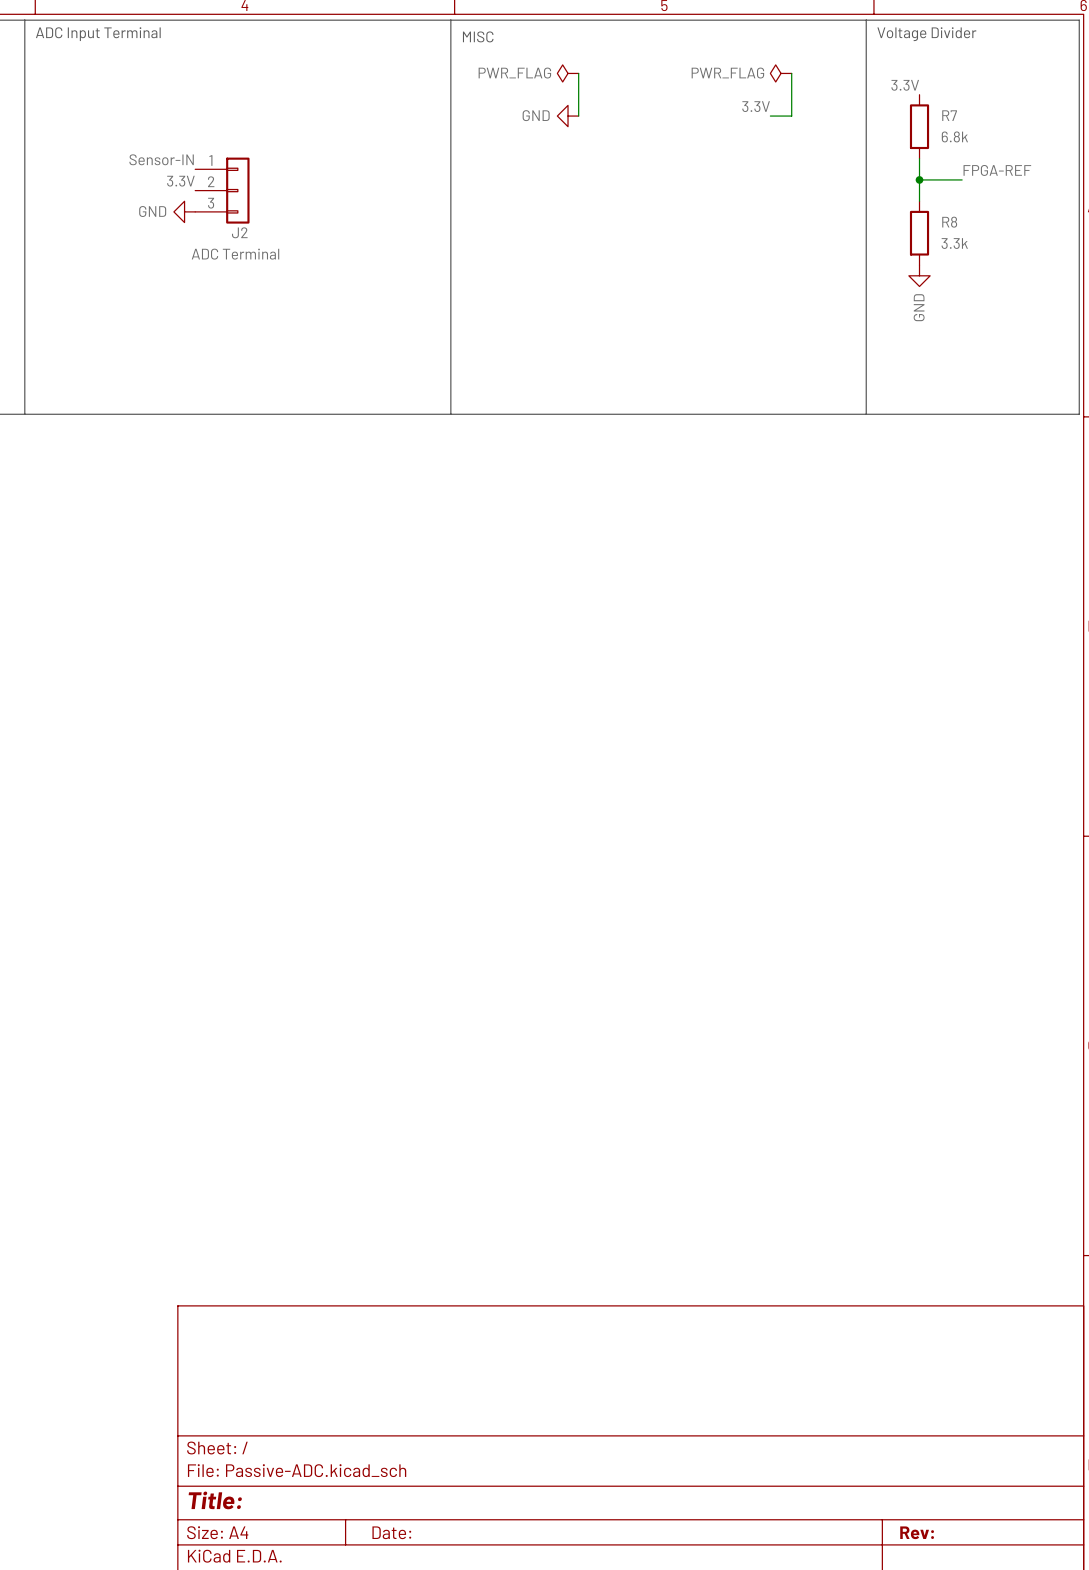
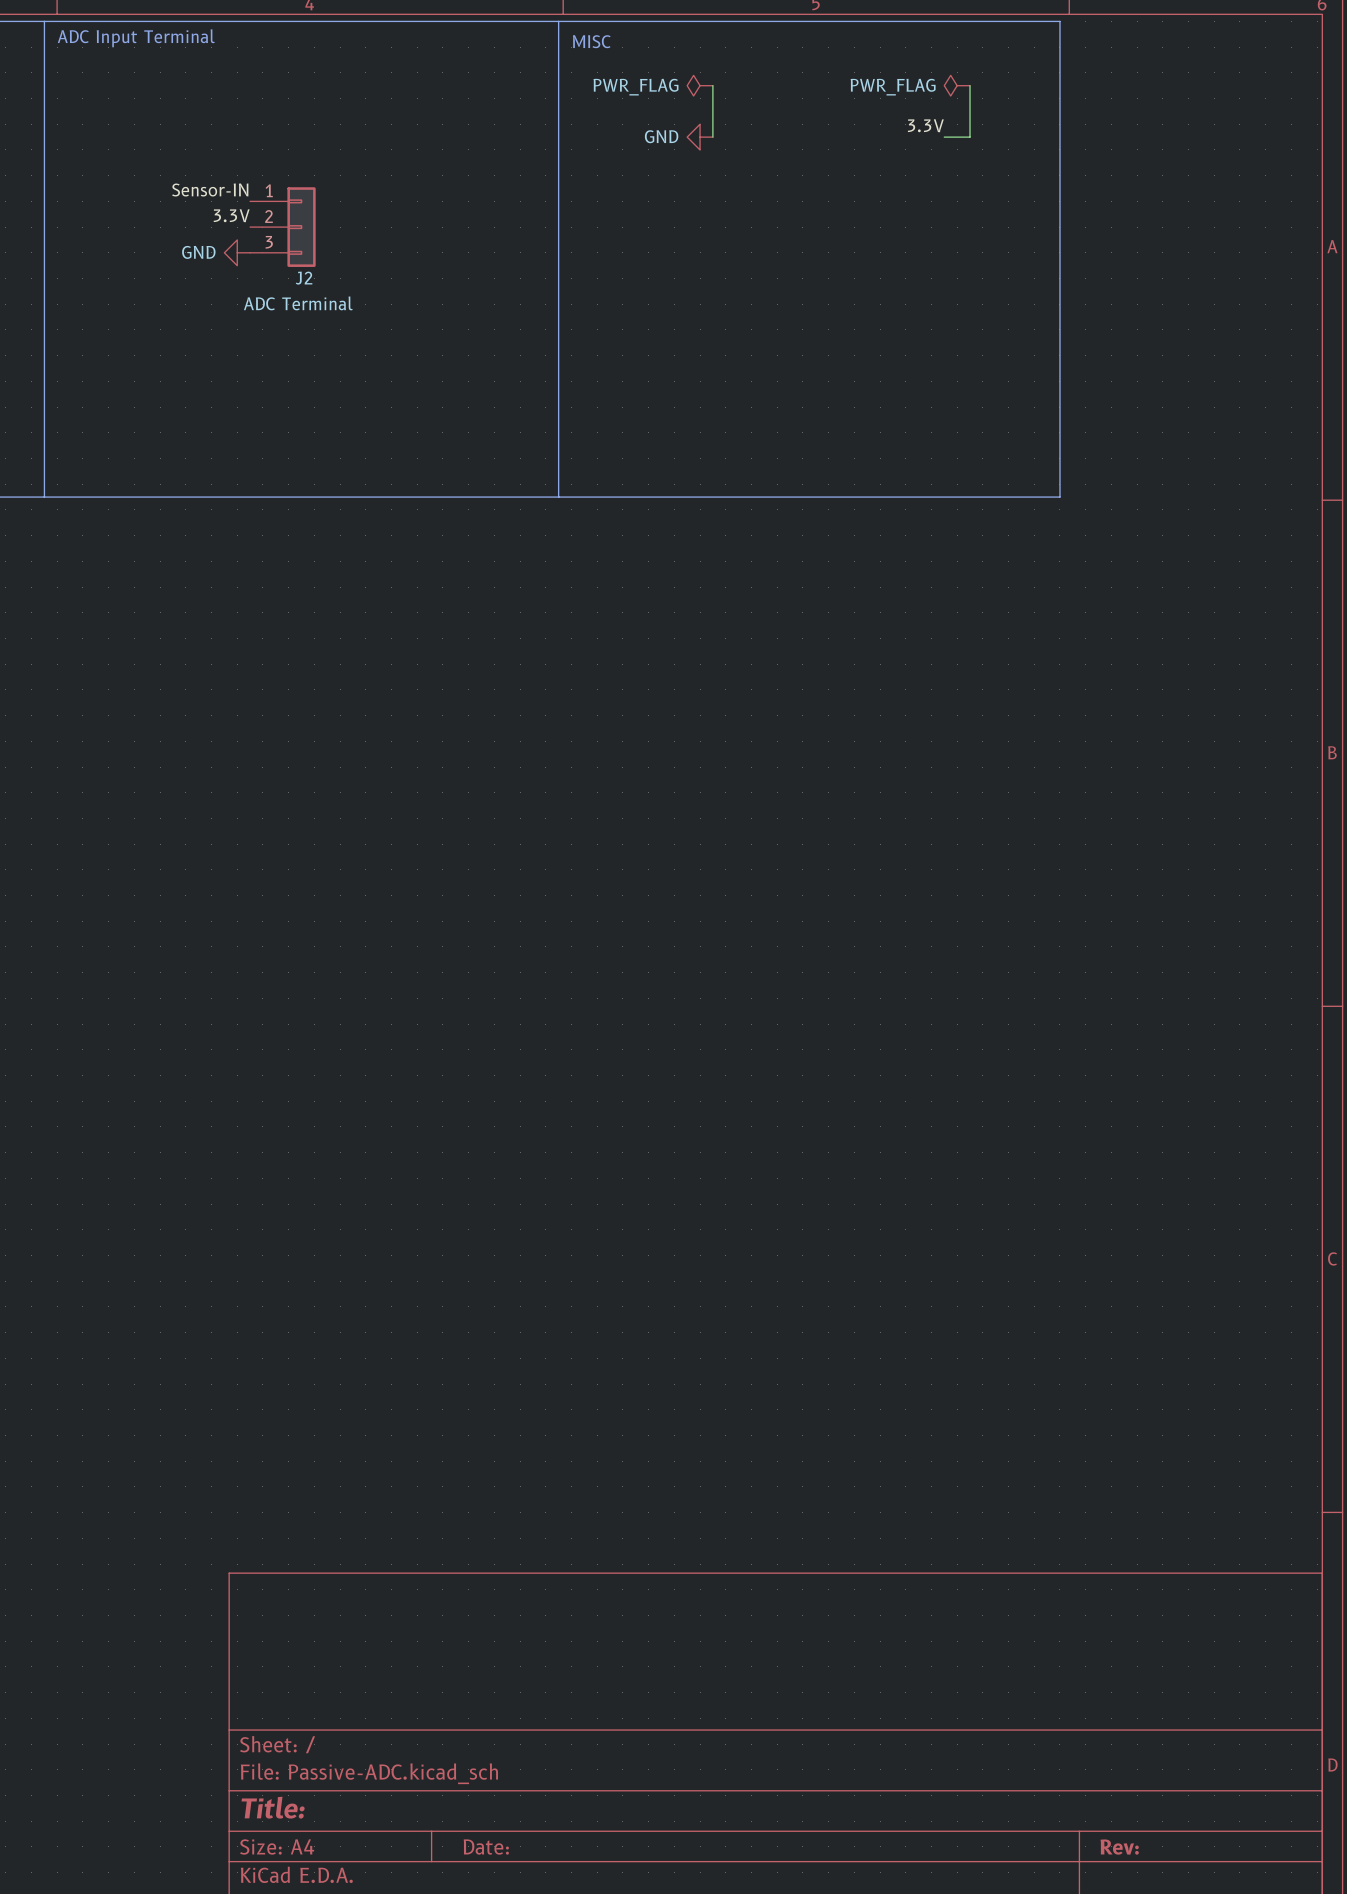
line: (866, 20) (1079, 20) (1079, 414) (866, 414) -> none
text: Voltage Divider (926, 34) -> none
label: 3.3V (905, 85) -> none
R7: 6.8k (919, 126) -> none
wire: (919, 158) (919, 201) -> none
label: FPGA-REF (997, 170) -> none
wire: (919, 179) (962, 179) -> none
junction: (919, 179) -> none
R8: 3.3k (919, 233) -> none
power symbol: GND (919, 275) -> none

